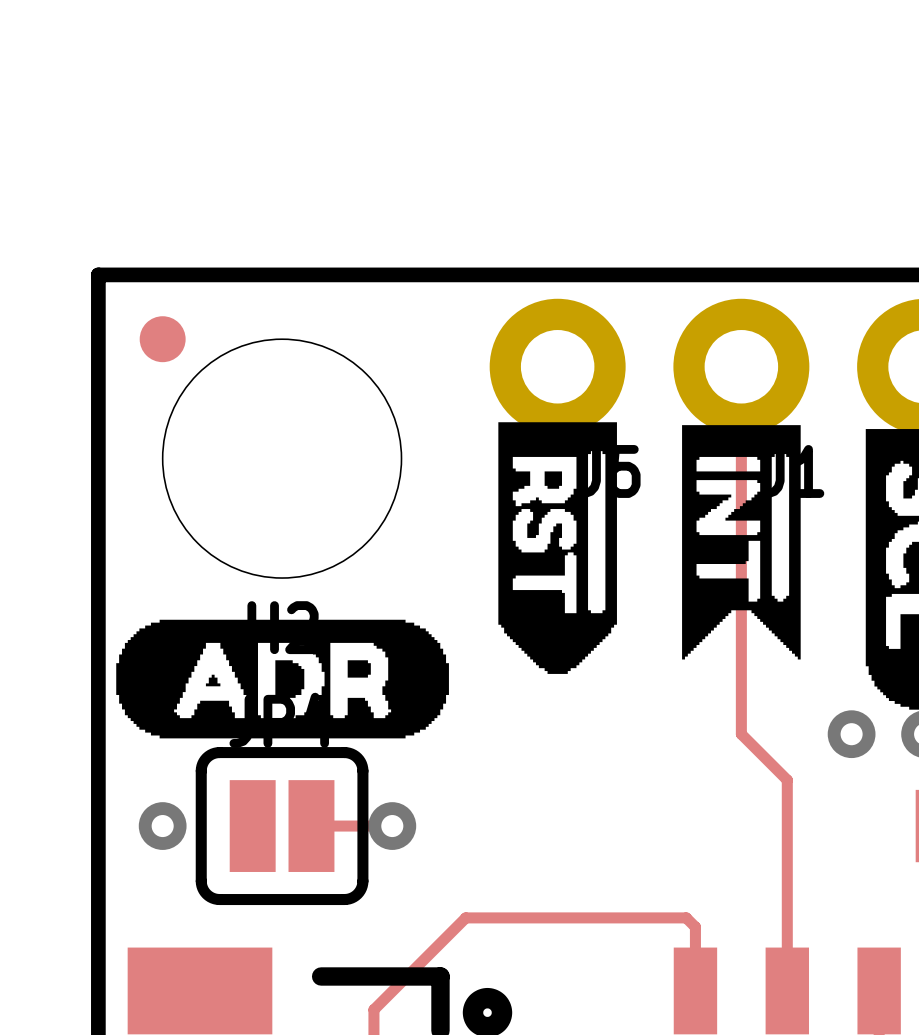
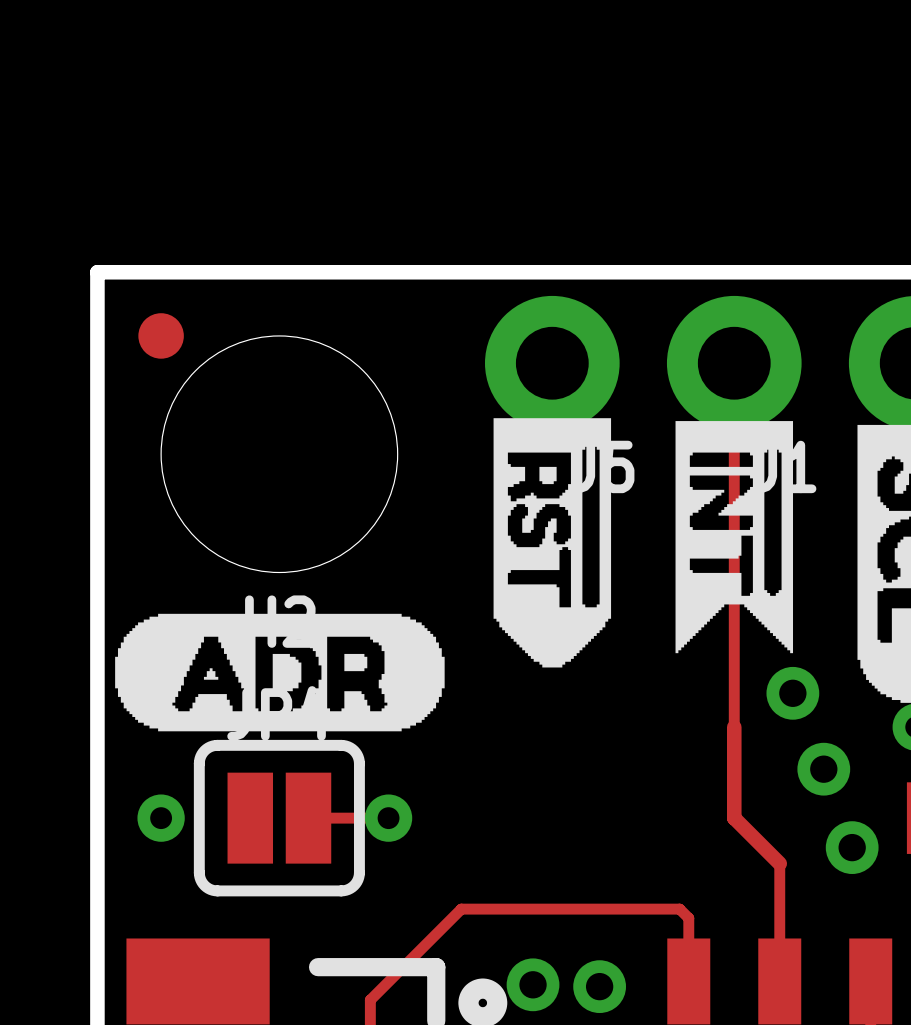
via: none -> (792, 693)
track: (741, 734) (787, 780) (787, 871) -> (734, 727) (734, 818) (779, 863)
via position: (851, 734) -> (823, 769)
via: none -> (852, 847)
via: none -> (533, 984)
via: none -> (599, 986)

